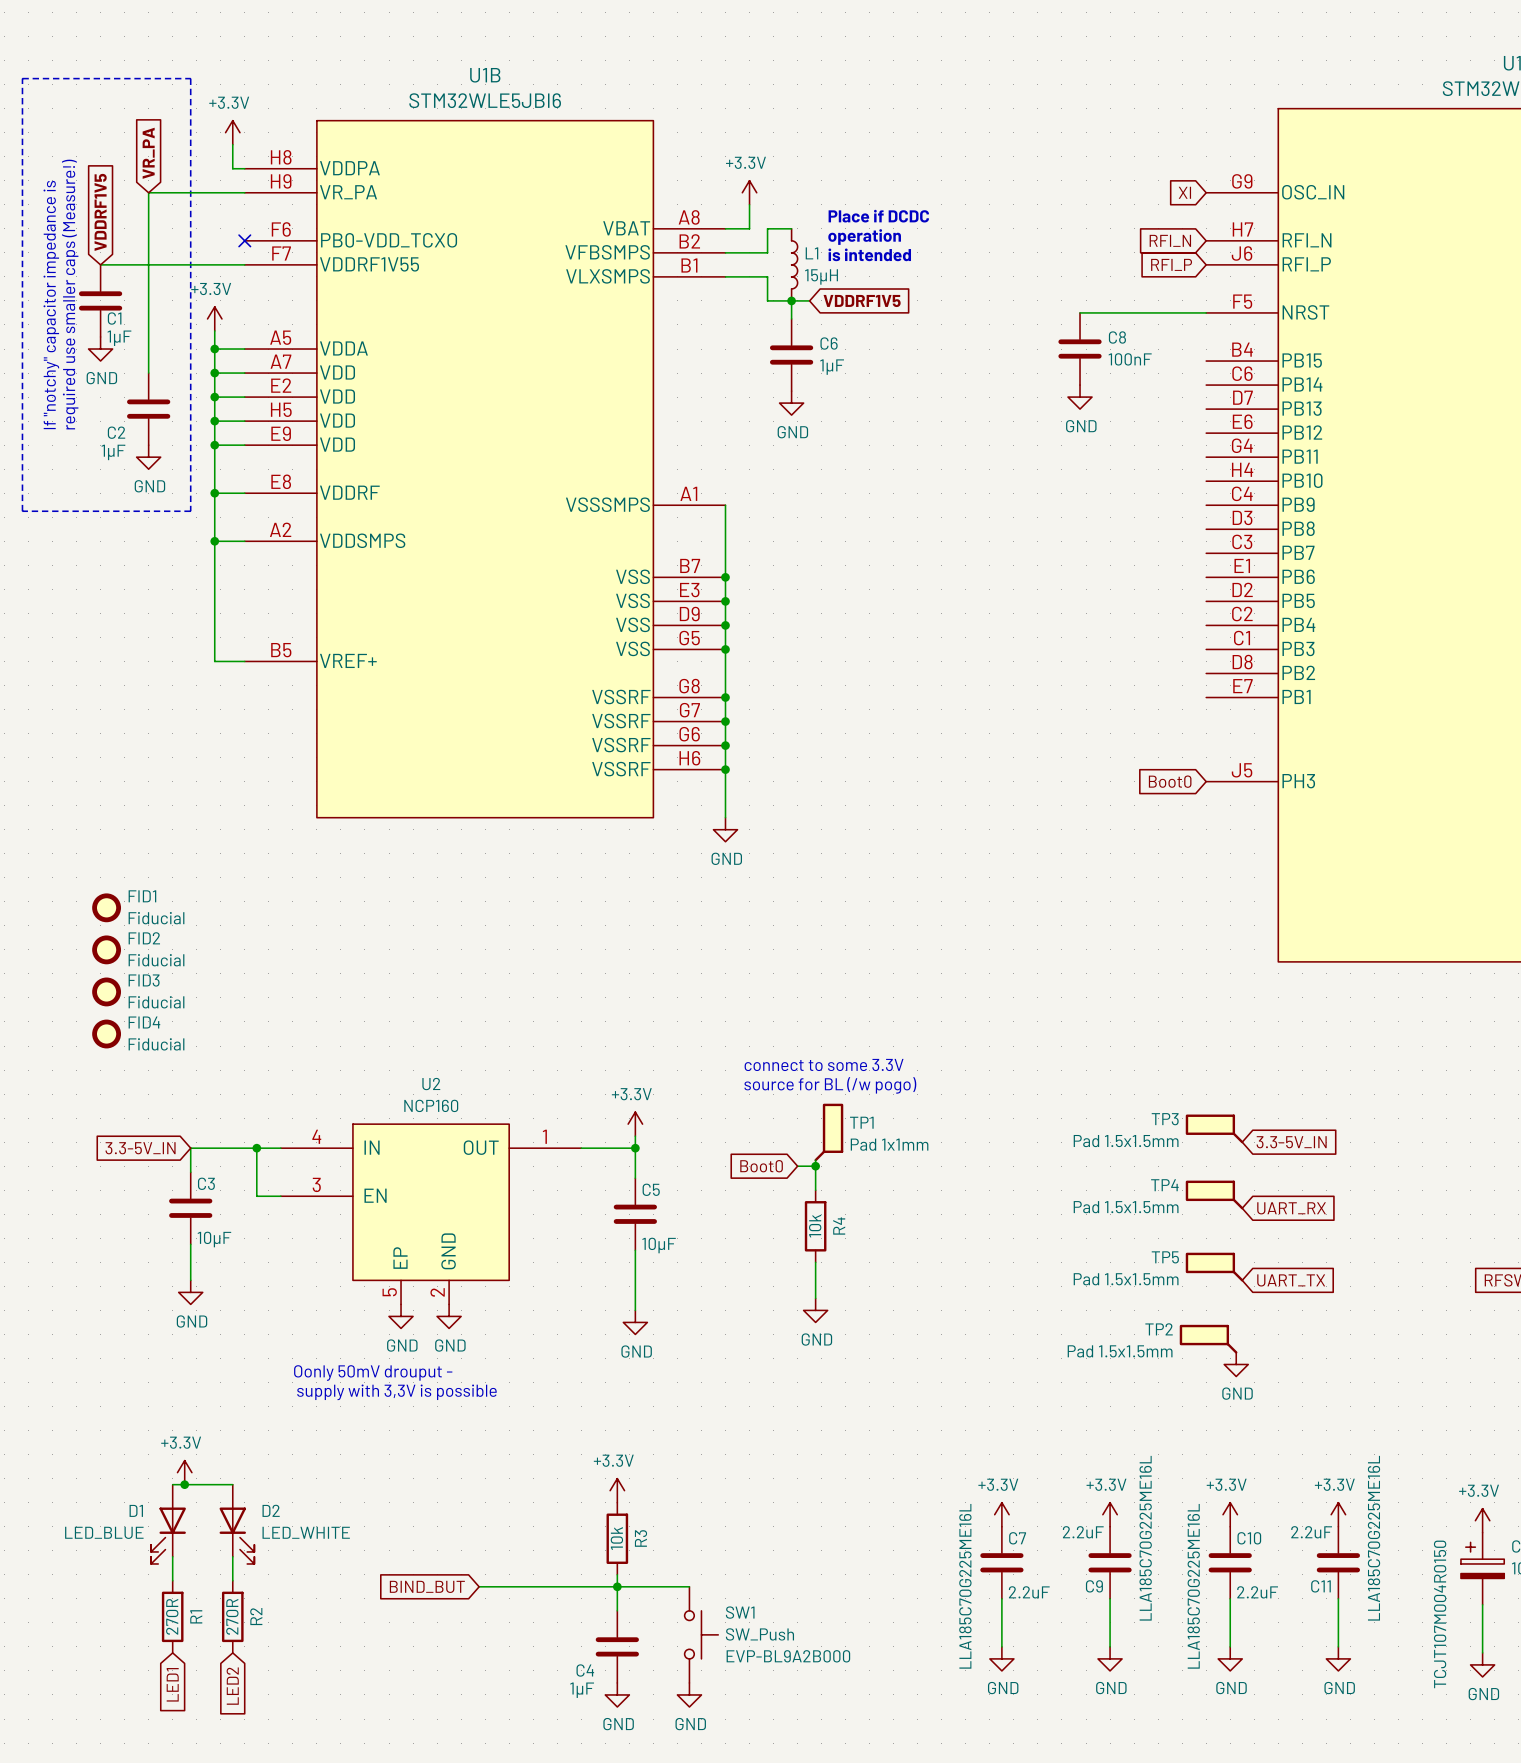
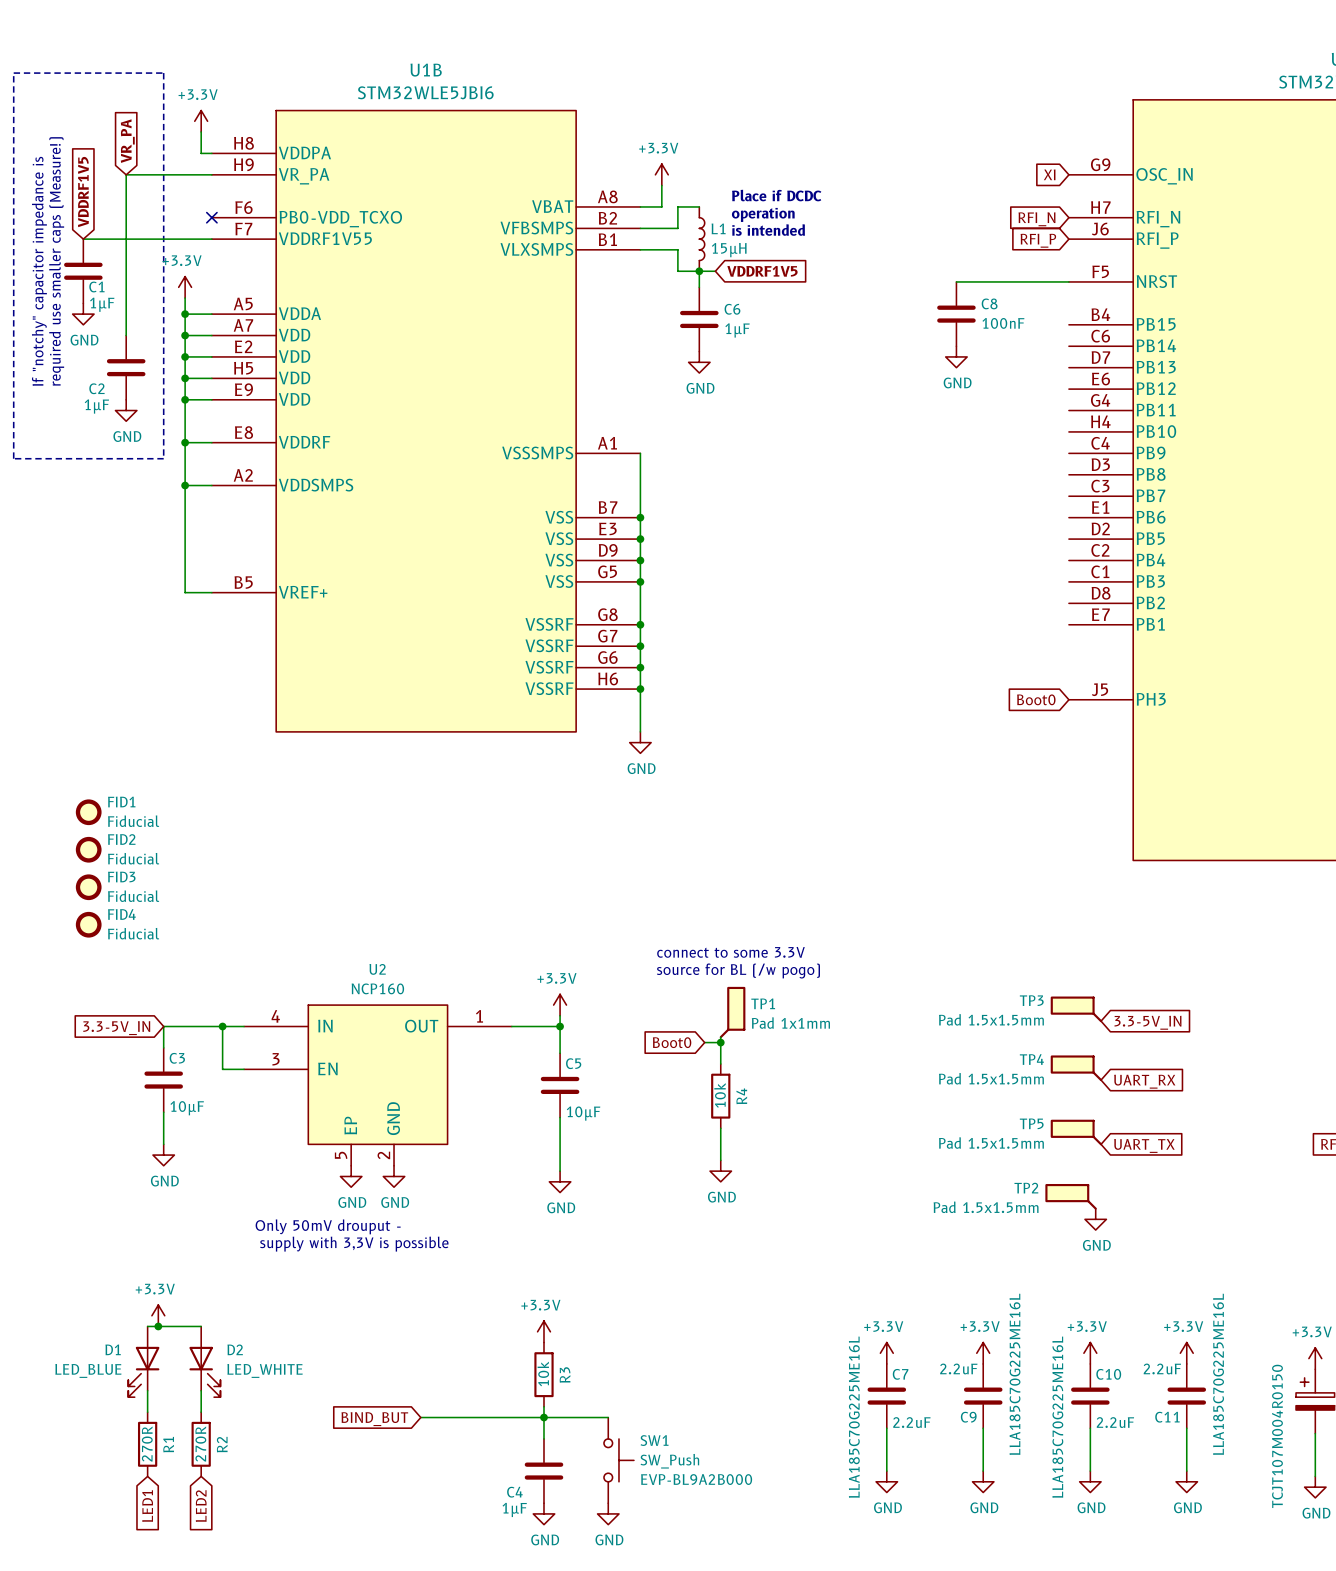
text: Oonly 50mV drouput - (373, 1372) -> Only 50mV drouput - (328, 1226)

